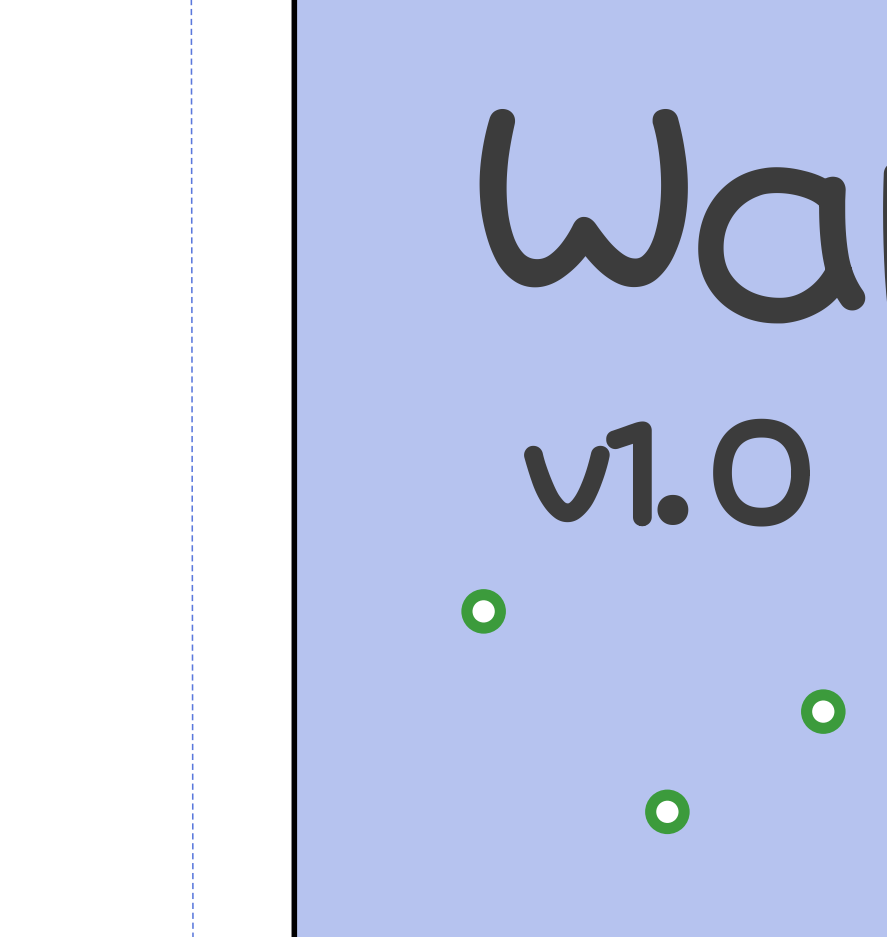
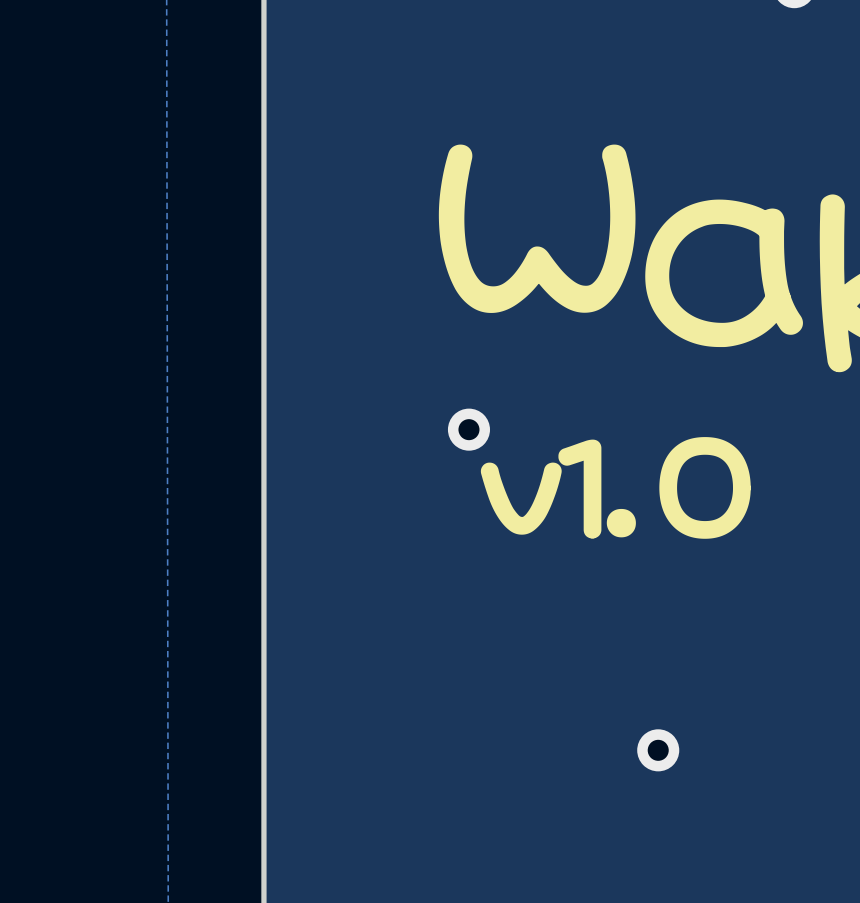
via: none -> (468, 429)
via: (483, 611) -> none
via: (823, 711) -> none
via: none -> (658, 750)
via: (667, 811) -> none

